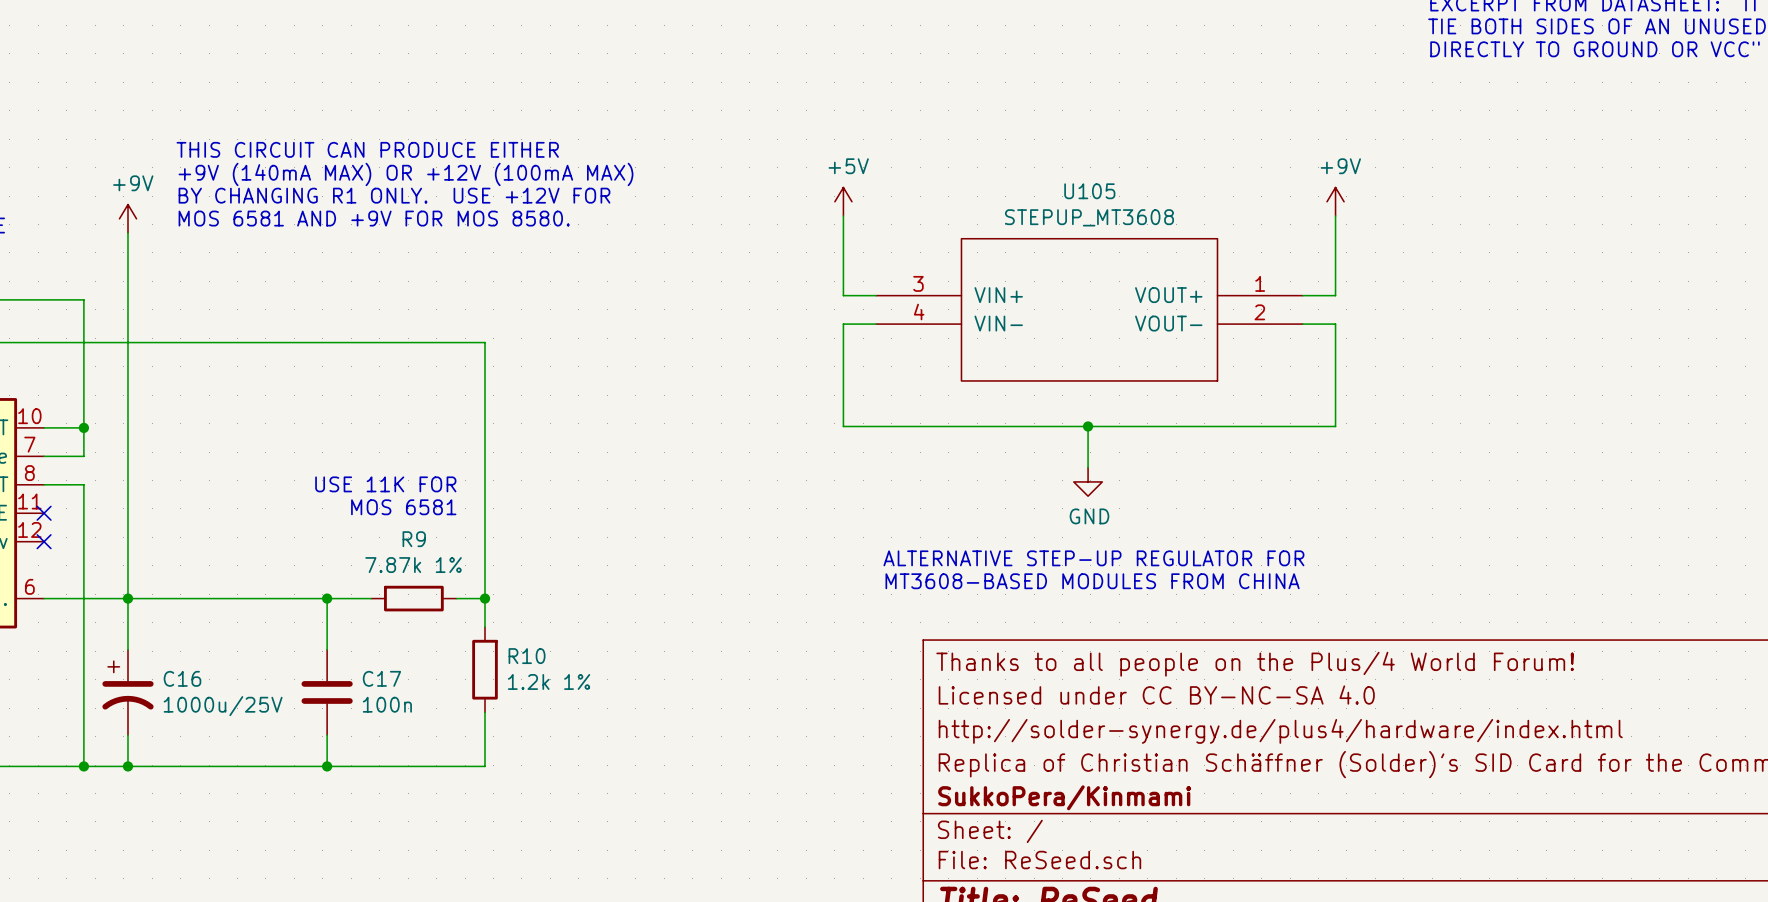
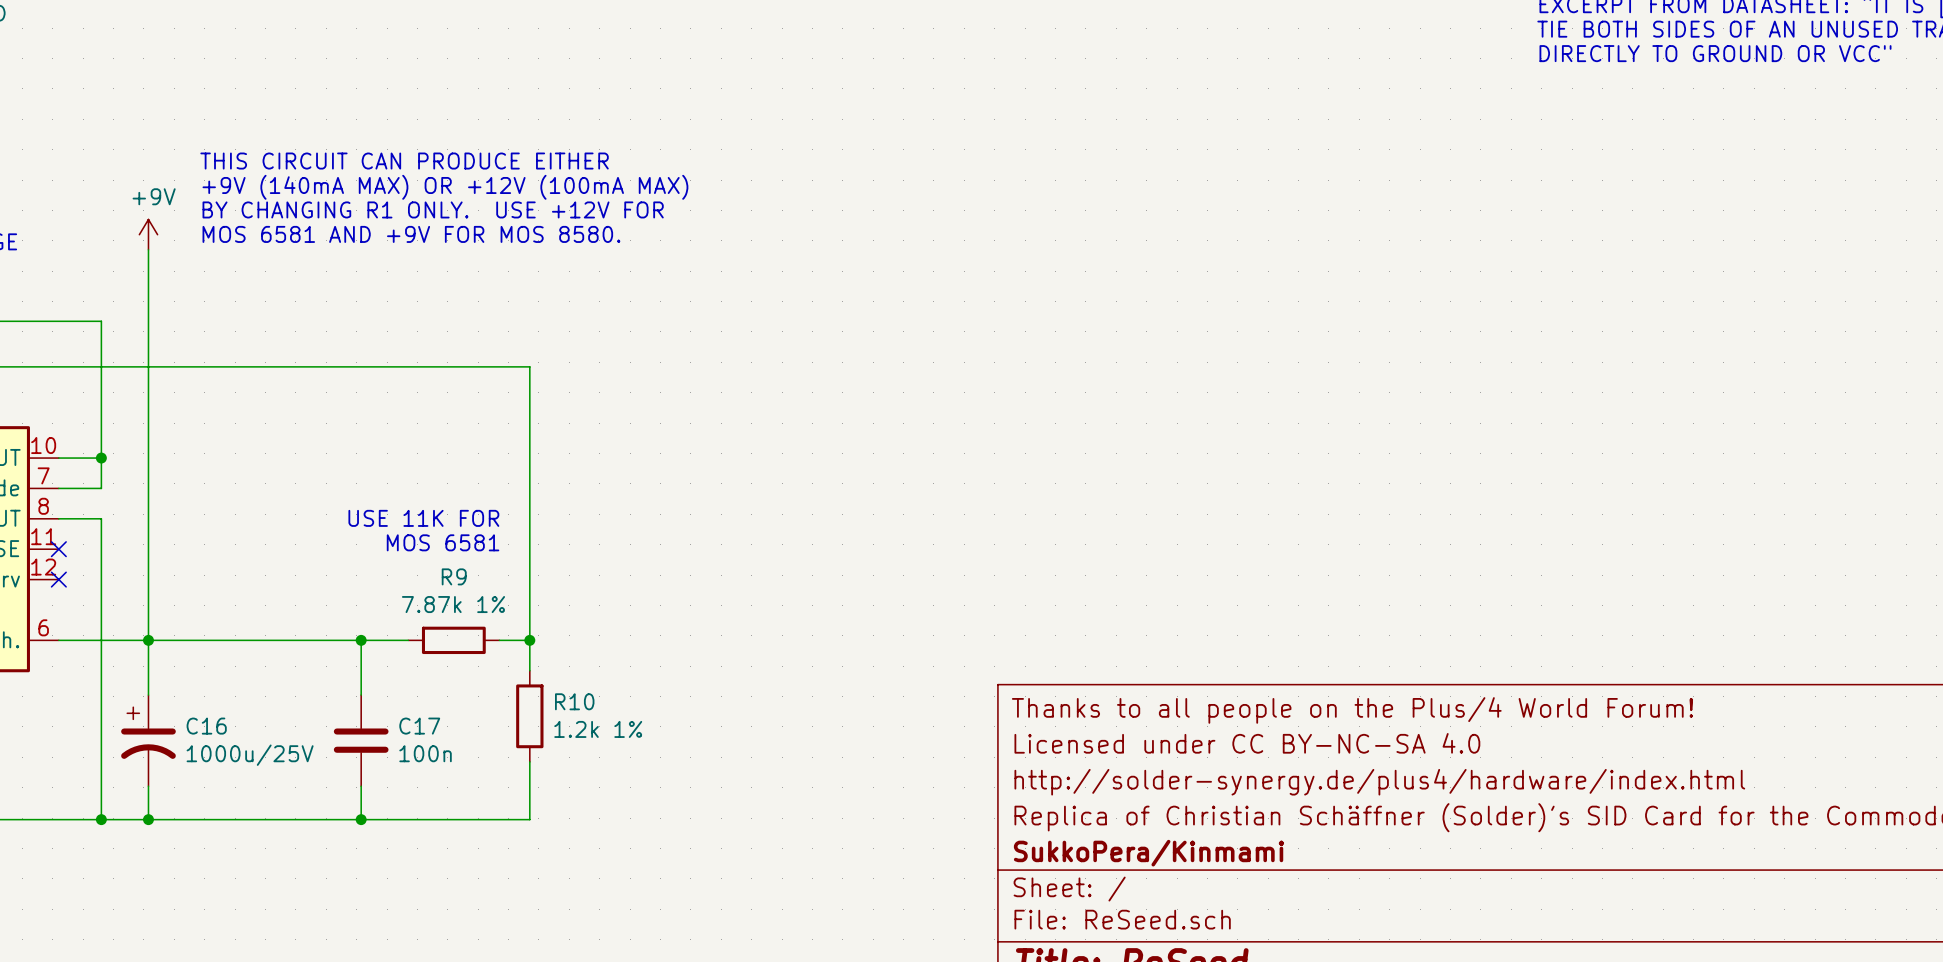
power symbol: +5V (843, 201) -> none
power symbol: +9V (1335, 201) -> none
wire: (843, 215) (843, 295) (876, 295) -> none
wire: (1335, 215) (1335, 295) (1302, 295) -> none
U105: STEPUP_MT3608 (1089, 309) -> none
wire: (876, 324) (843, 324) (843, 426) (1335, 426) (1335, 324) (1302, 324) -> none
wire: (1088, 426) (1088, 467) -> none
junction: (1088, 426) -> none
power symbol: GND (1088, 481) -> none
text: ALTERNATIVE STEP-UP REGULATOR FOR (1093, 558) -> none
text: MT3608-BASED MODULES FROM CHINA (1092, 581) -> none

